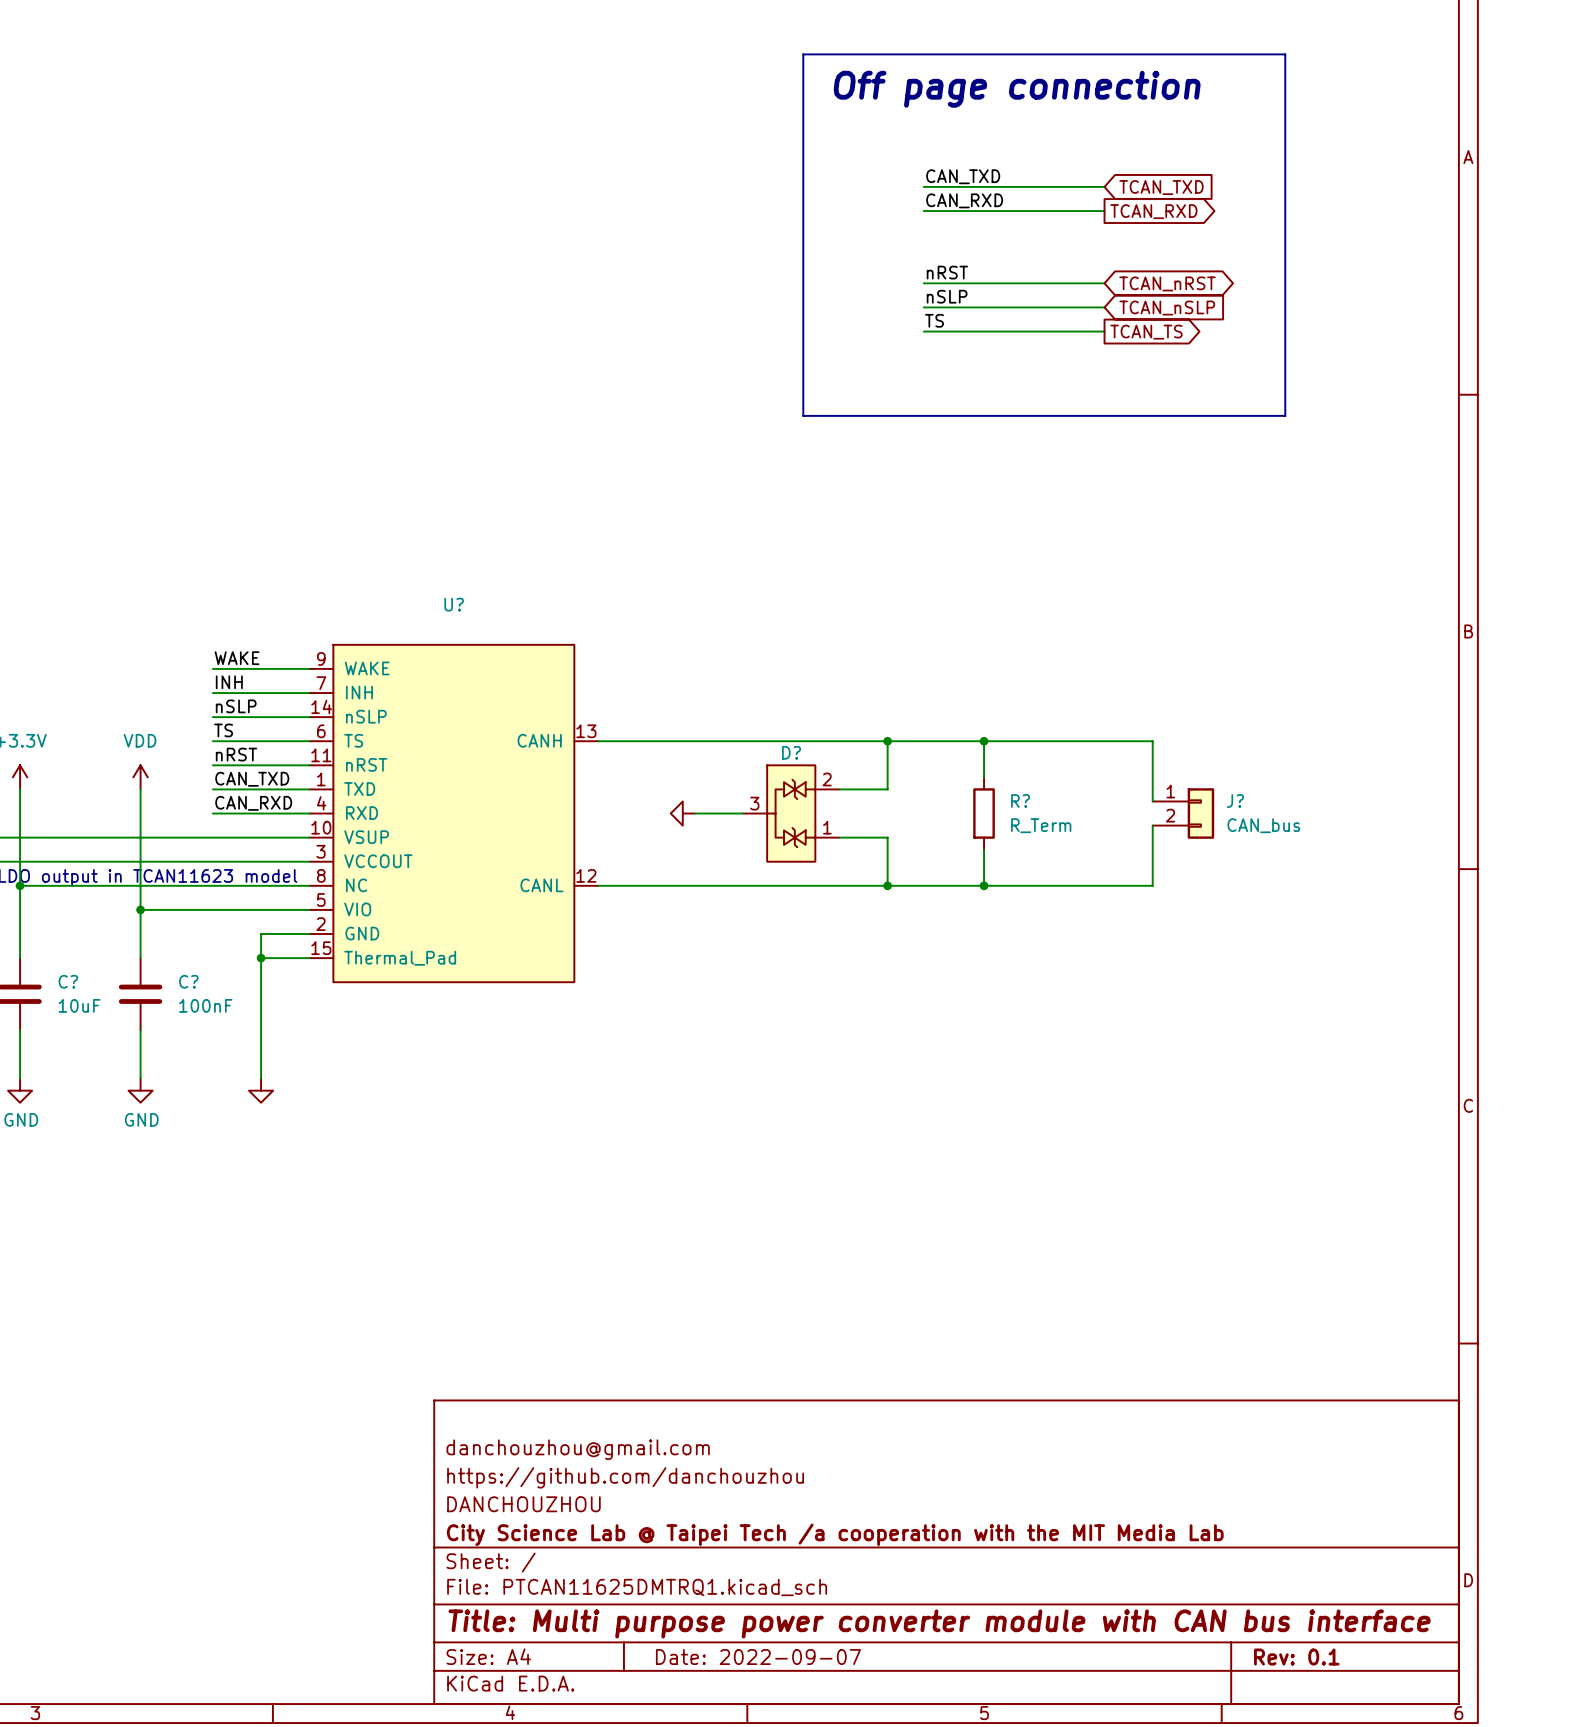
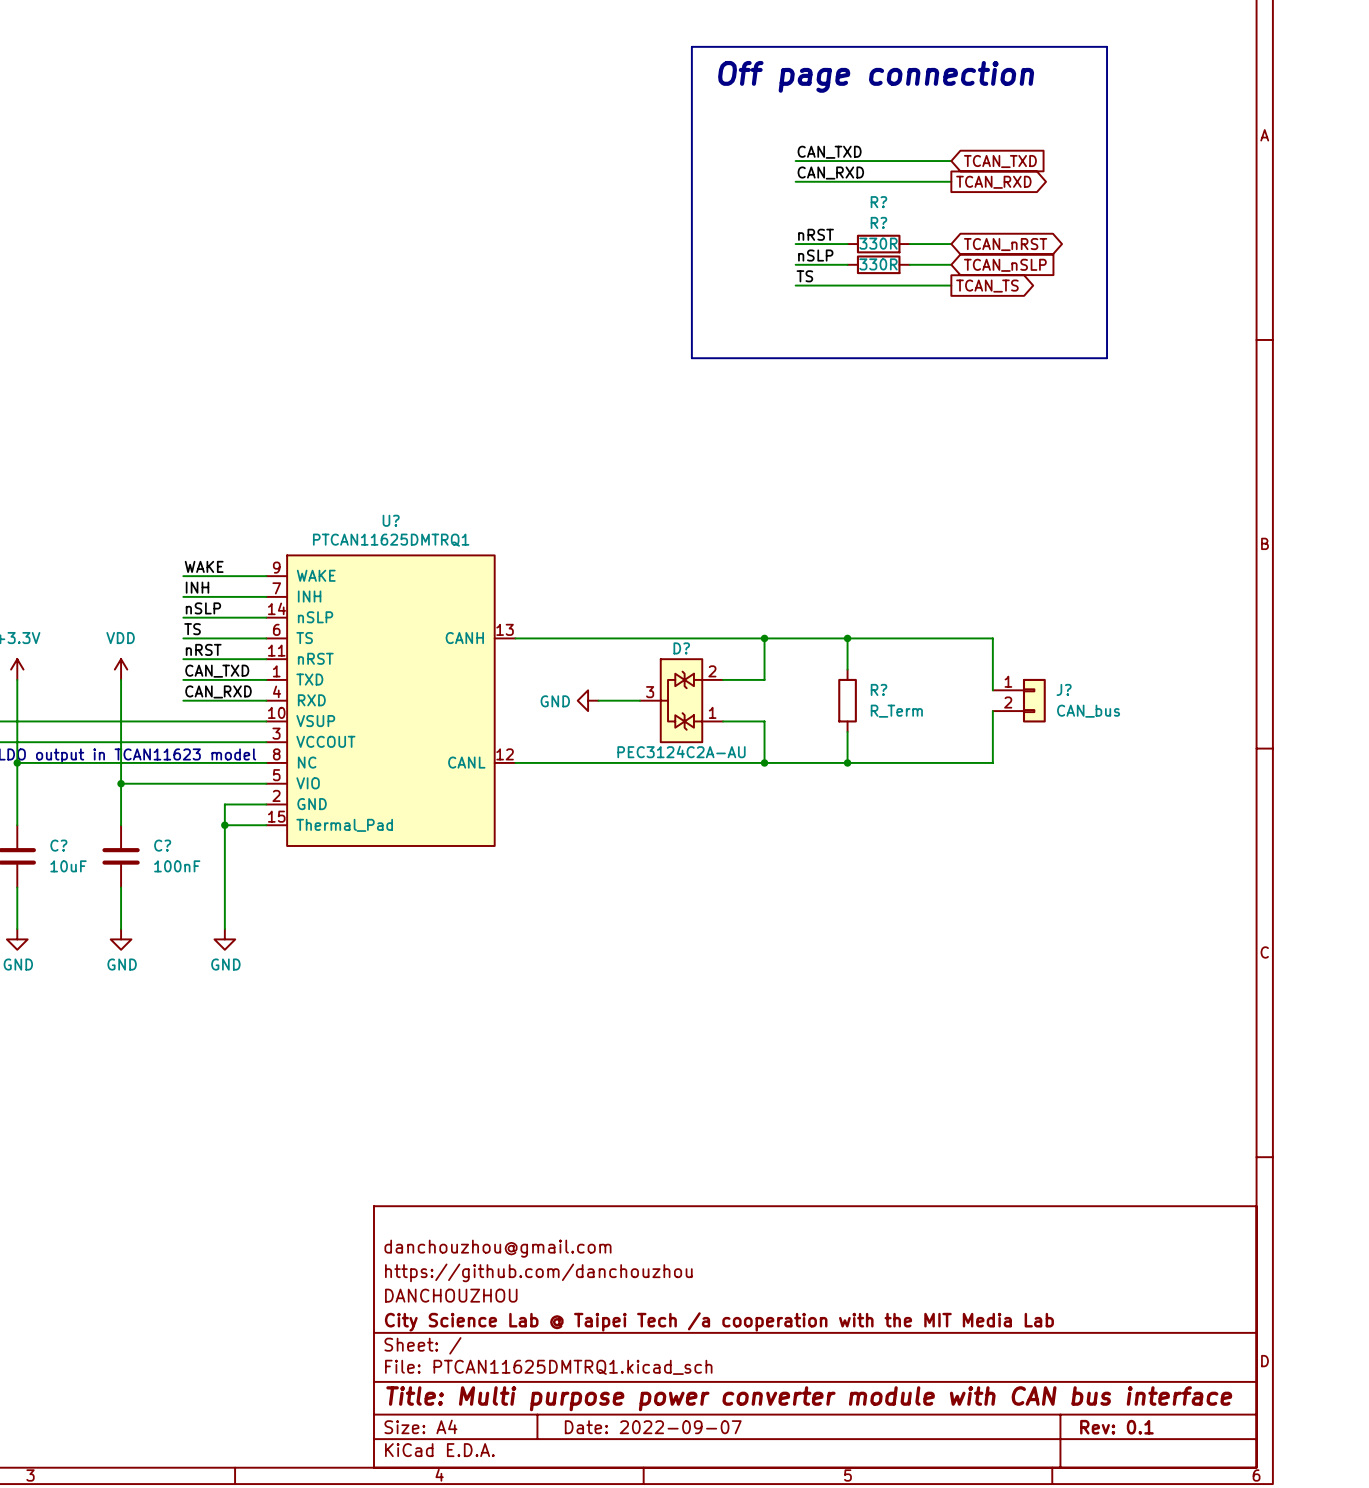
R?: none -> 330R (878, 244)
R?: none -> 330R (878, 264)
U? value: none -> PTCAN11625DMTRQ1 (391, 540)
power symbol text: none -> GND (555, 701)
D? value: none -> PEC3124C2A-AU (681, 751)
power symbol text: none -> GND (225, 964)

